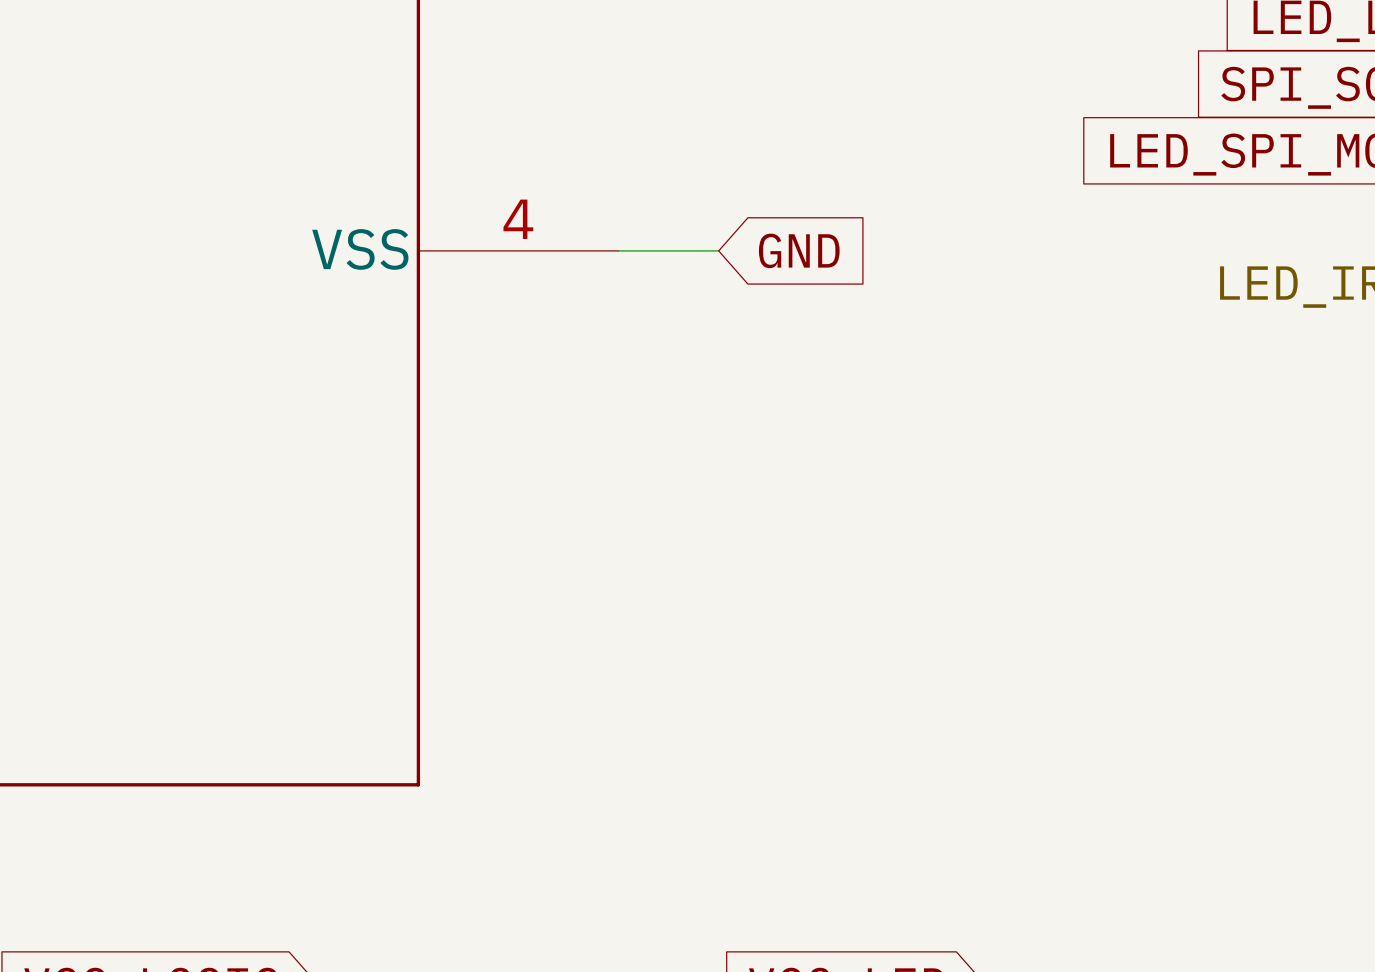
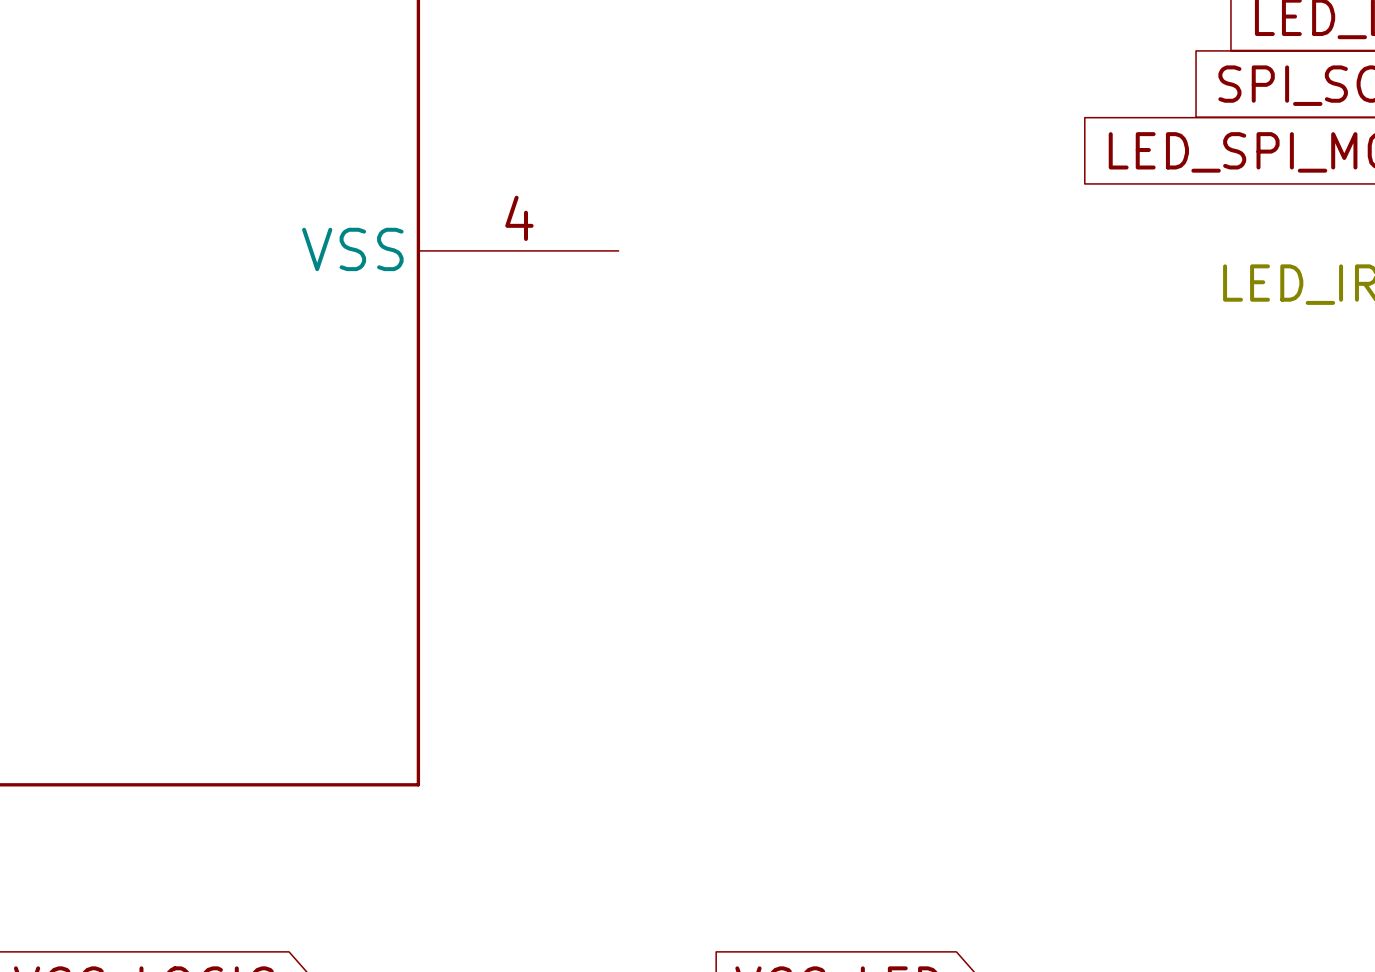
wire: (618, 250) (718, 250) -> none
global label: GND (799, 250) -> none

